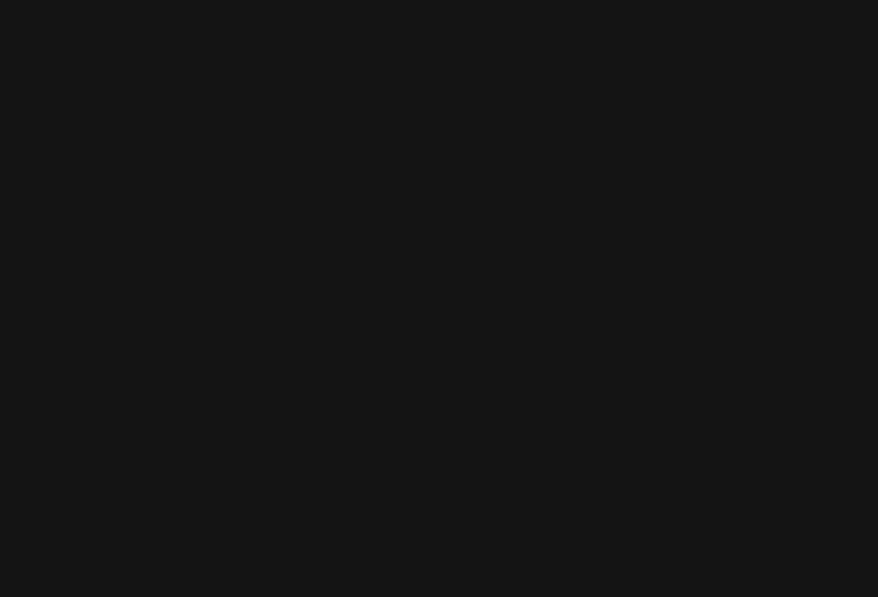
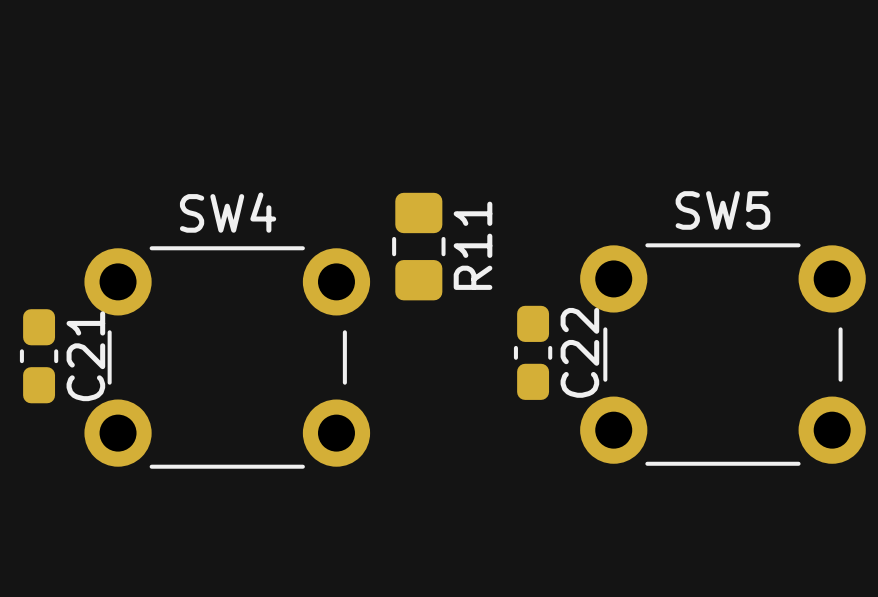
R11: none -> (418, 246)
C22: none -> (533, 352)
SW5: none -> (722, 354)
C21: none -> (39, 356)
SW4: none -> (227, 357)

